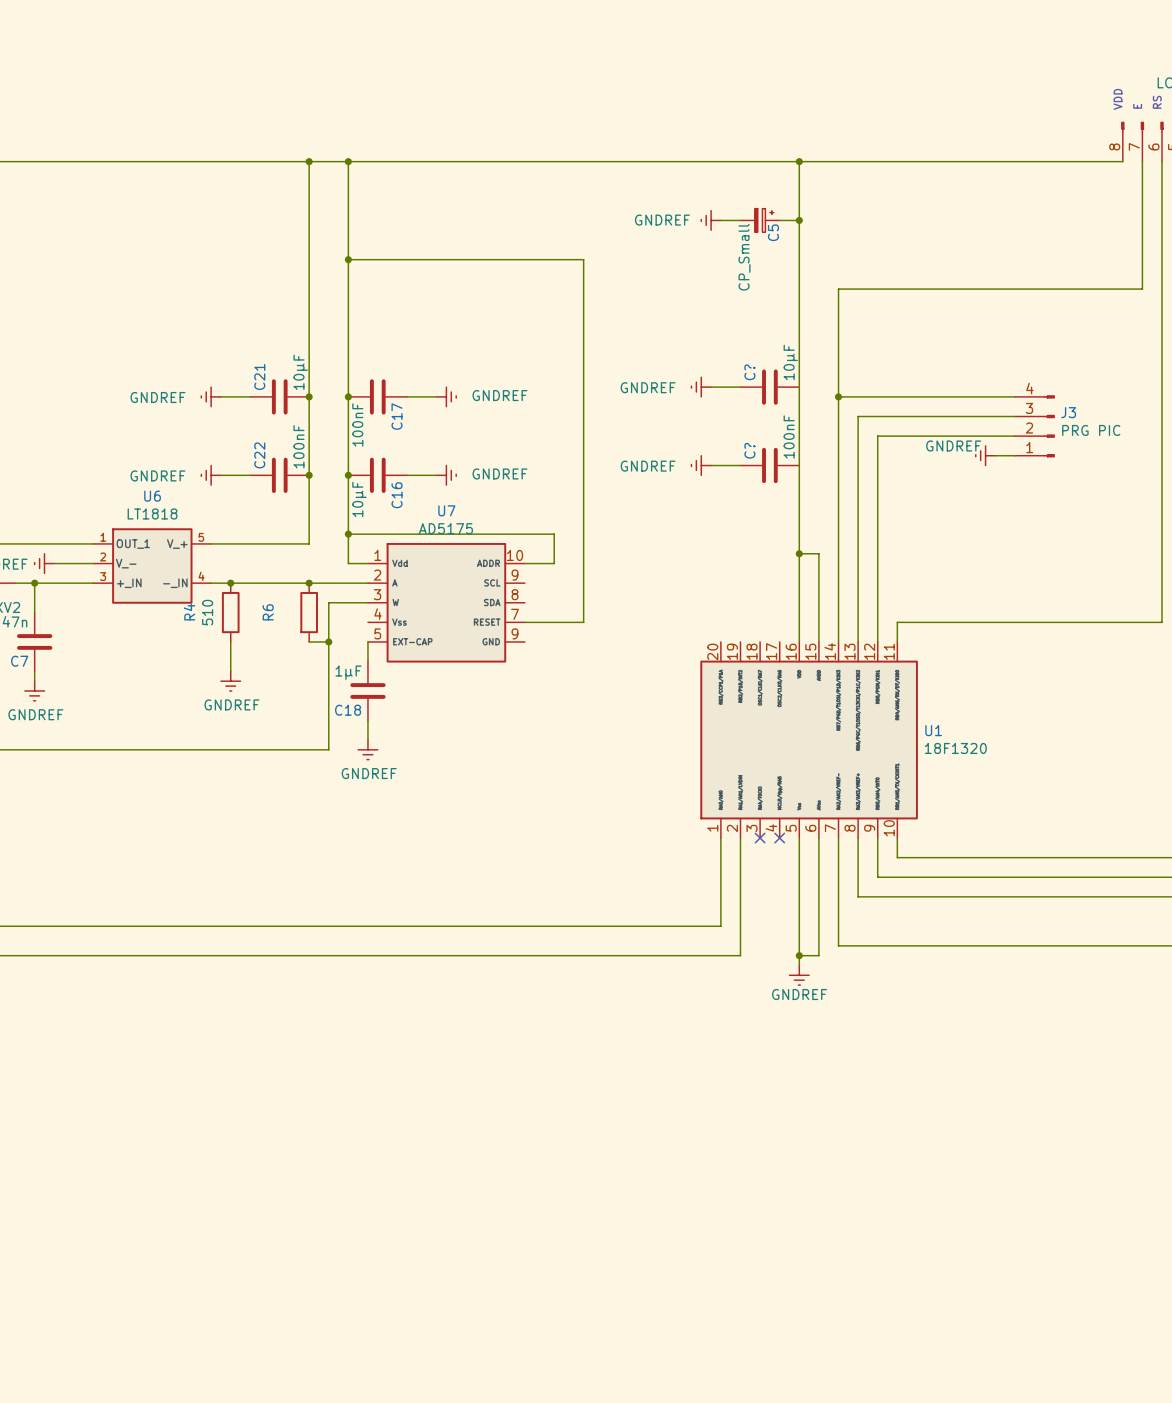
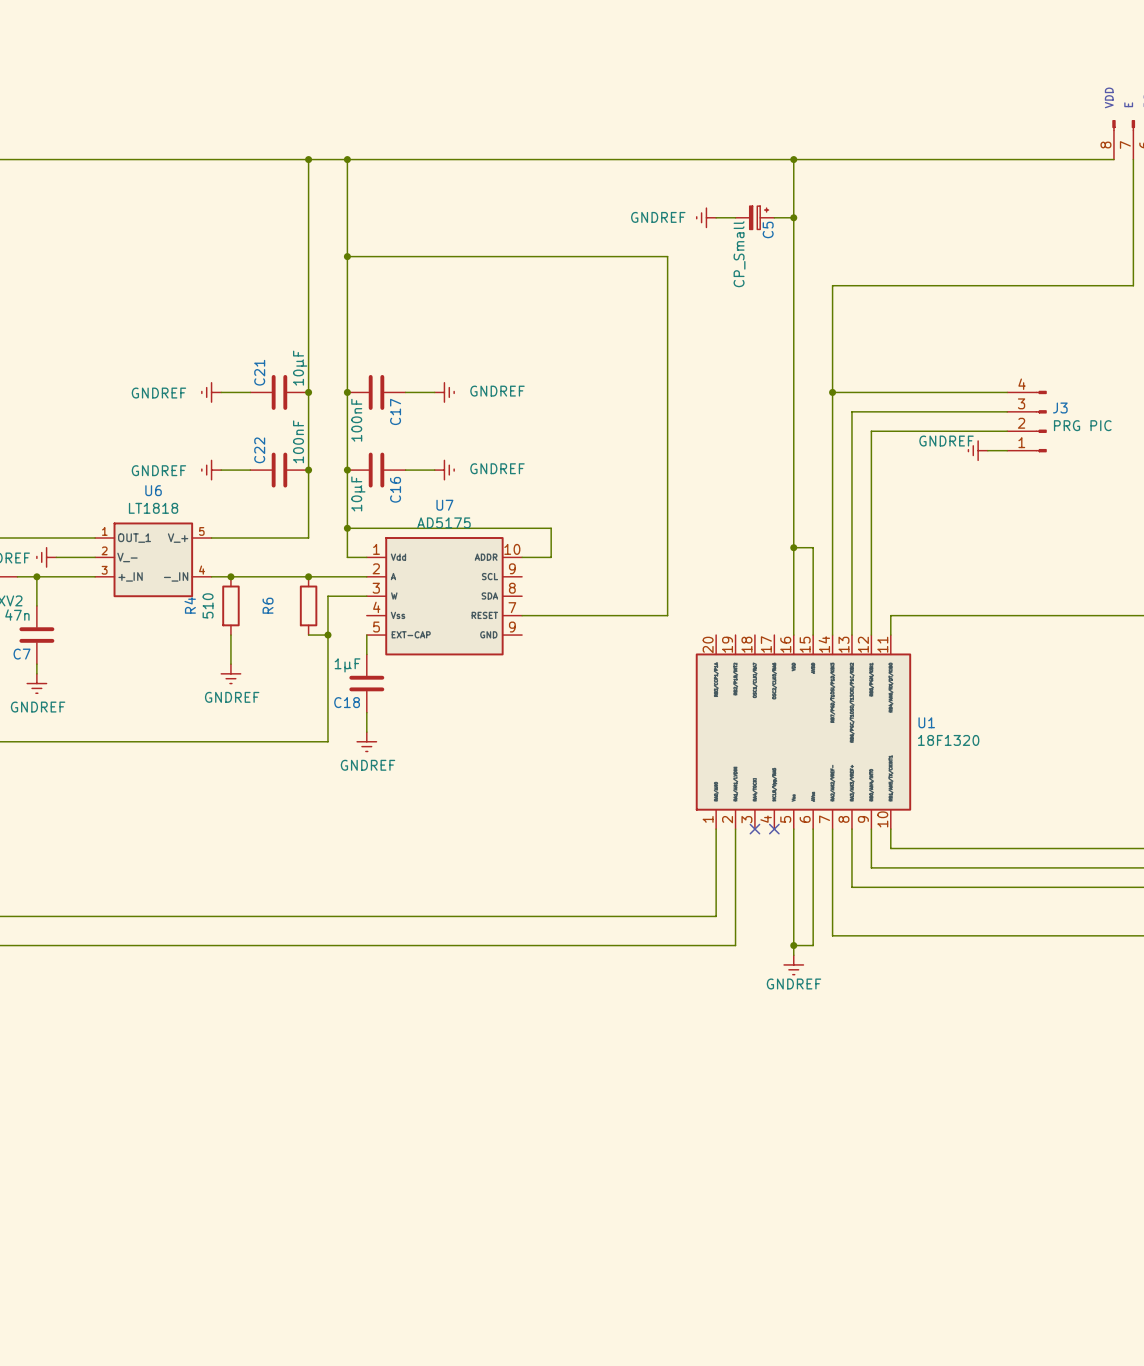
wire: (583, 259) (583, 622) -> (580, 256) (667, 256) (667, 615) (580, 615)
power symbol: GNDREF (701, 387) -> none
wire: (711, 387) (740, 387) -> none
C?: 10µF (769, 387) -> none
power symbol: GNDREF (701, 465) -> none
wire: (711, 465) (740, 465) -> none
C?: 100nF (769, 465) -> none

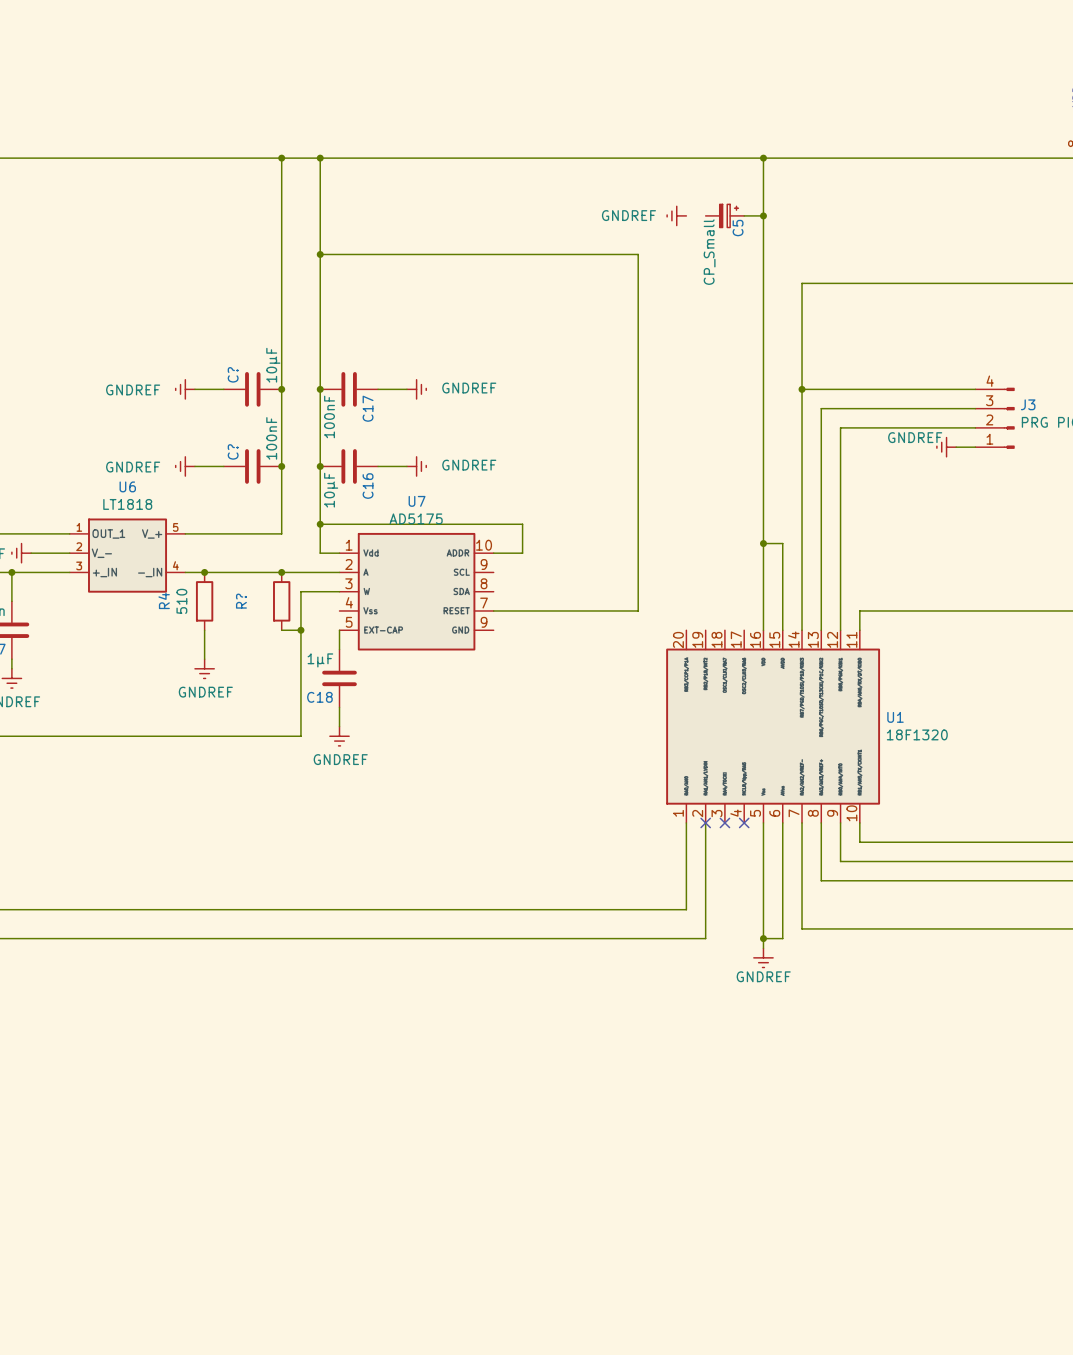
wire: (716, 217) (735, 217) -> none
C21 name: C21 (259, 372) -> C? (233, 374)
C22 name: C22 (259, 450) -> C? (233, 451)
R6 name: R6 (268, 605) -> R? (241, 601)
no-connect mark: none -> (705, 822)

